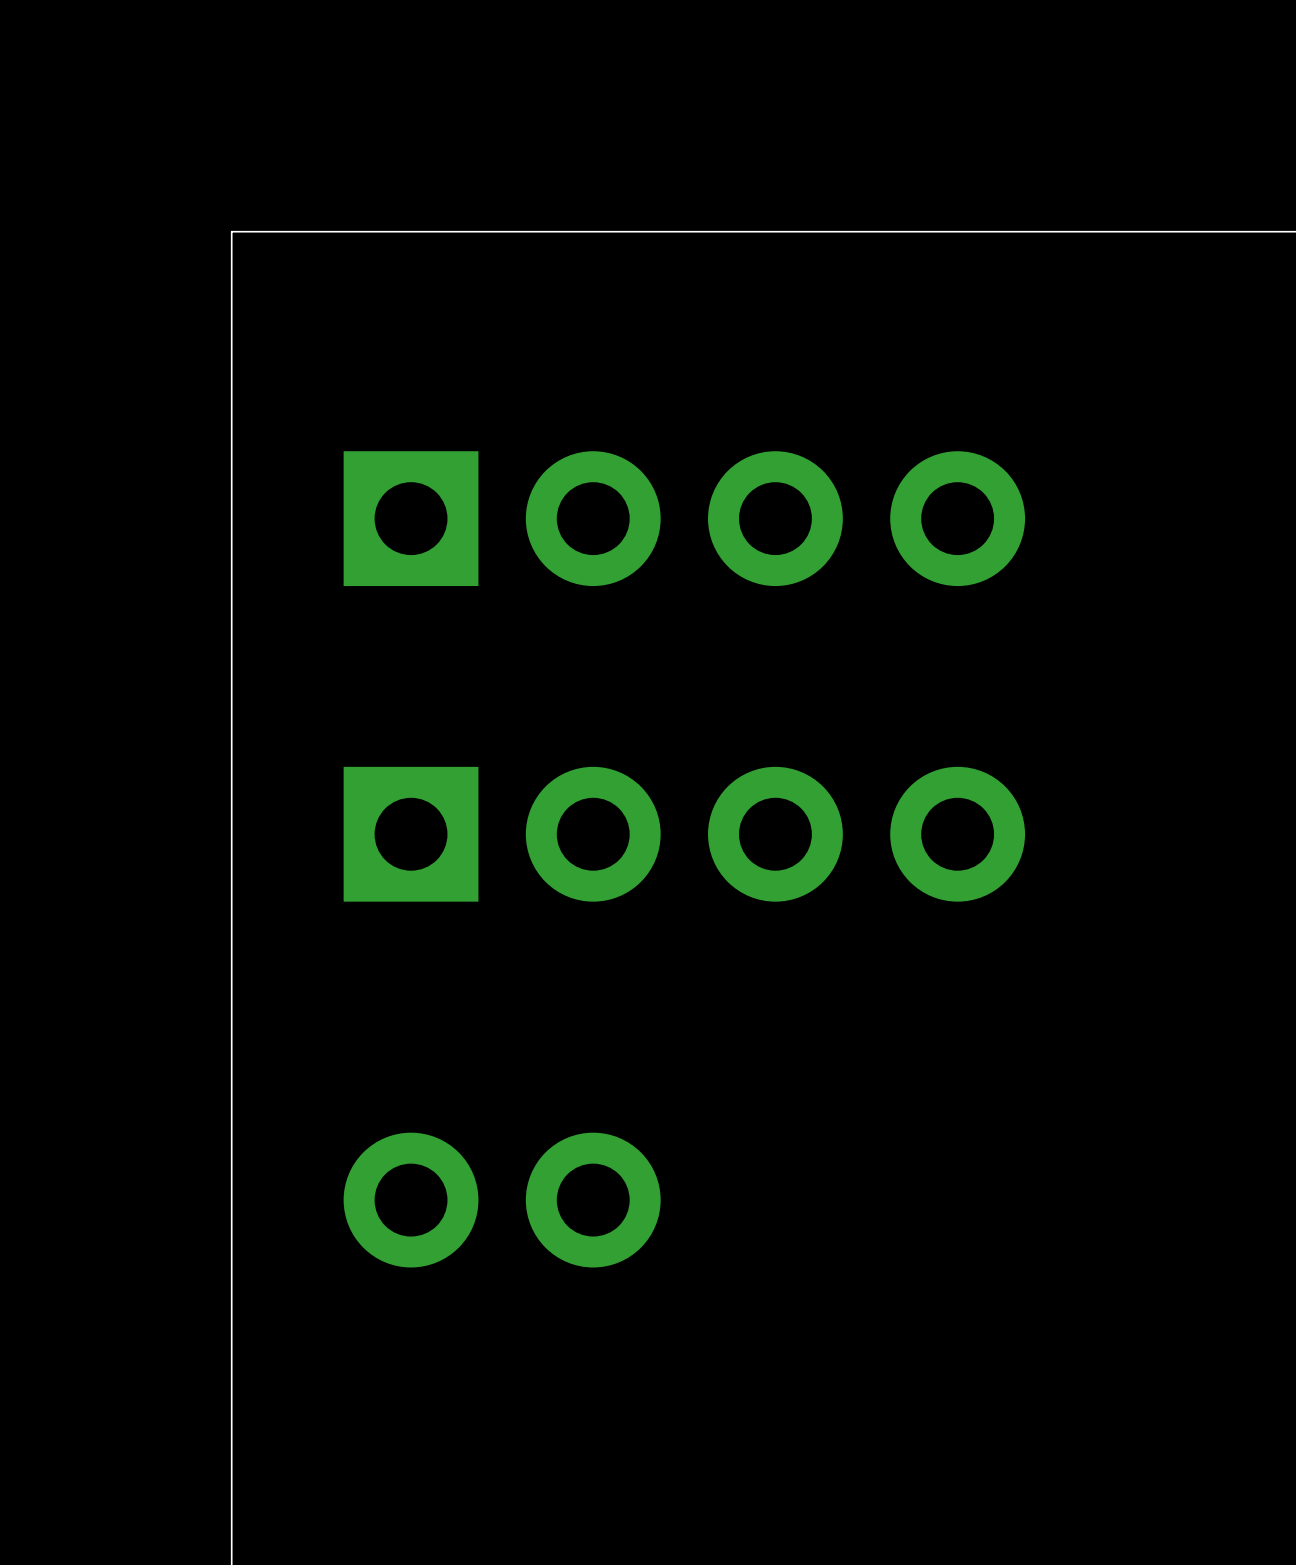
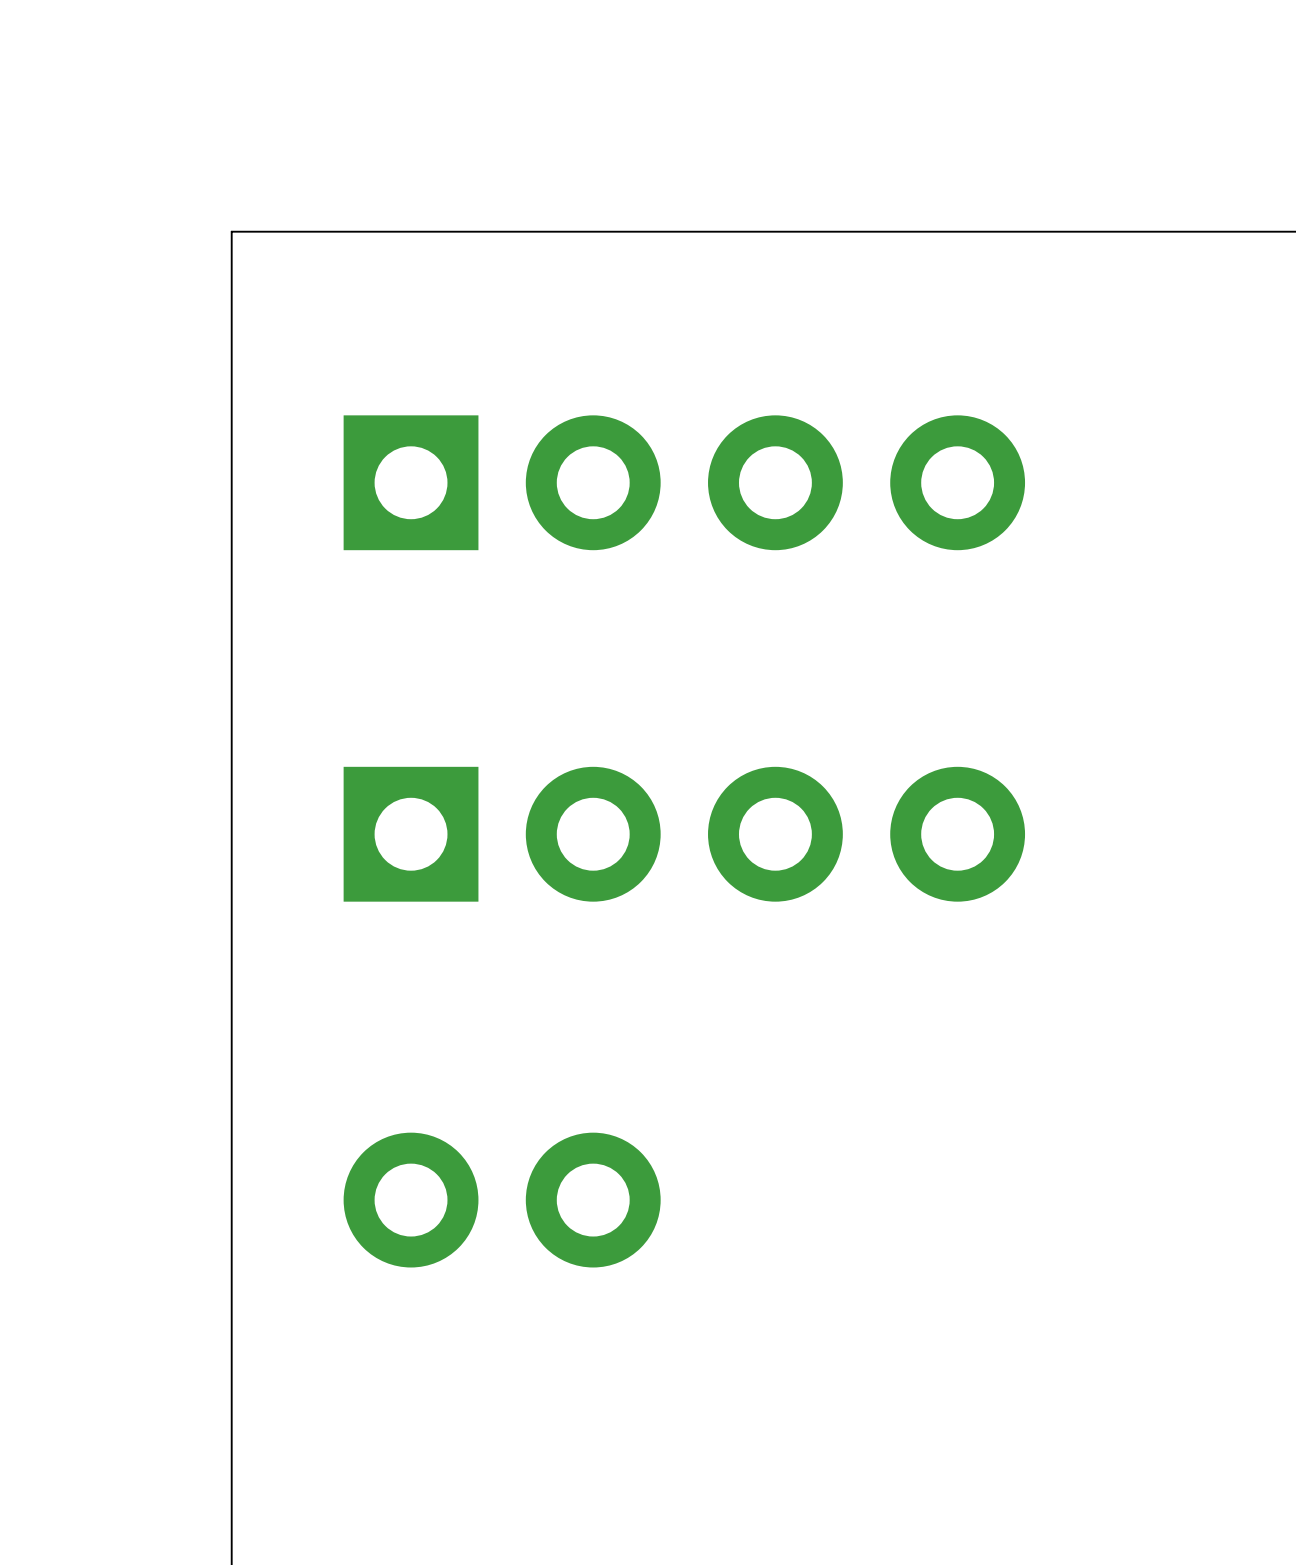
part position: (684, 518) -> (684, 482)

